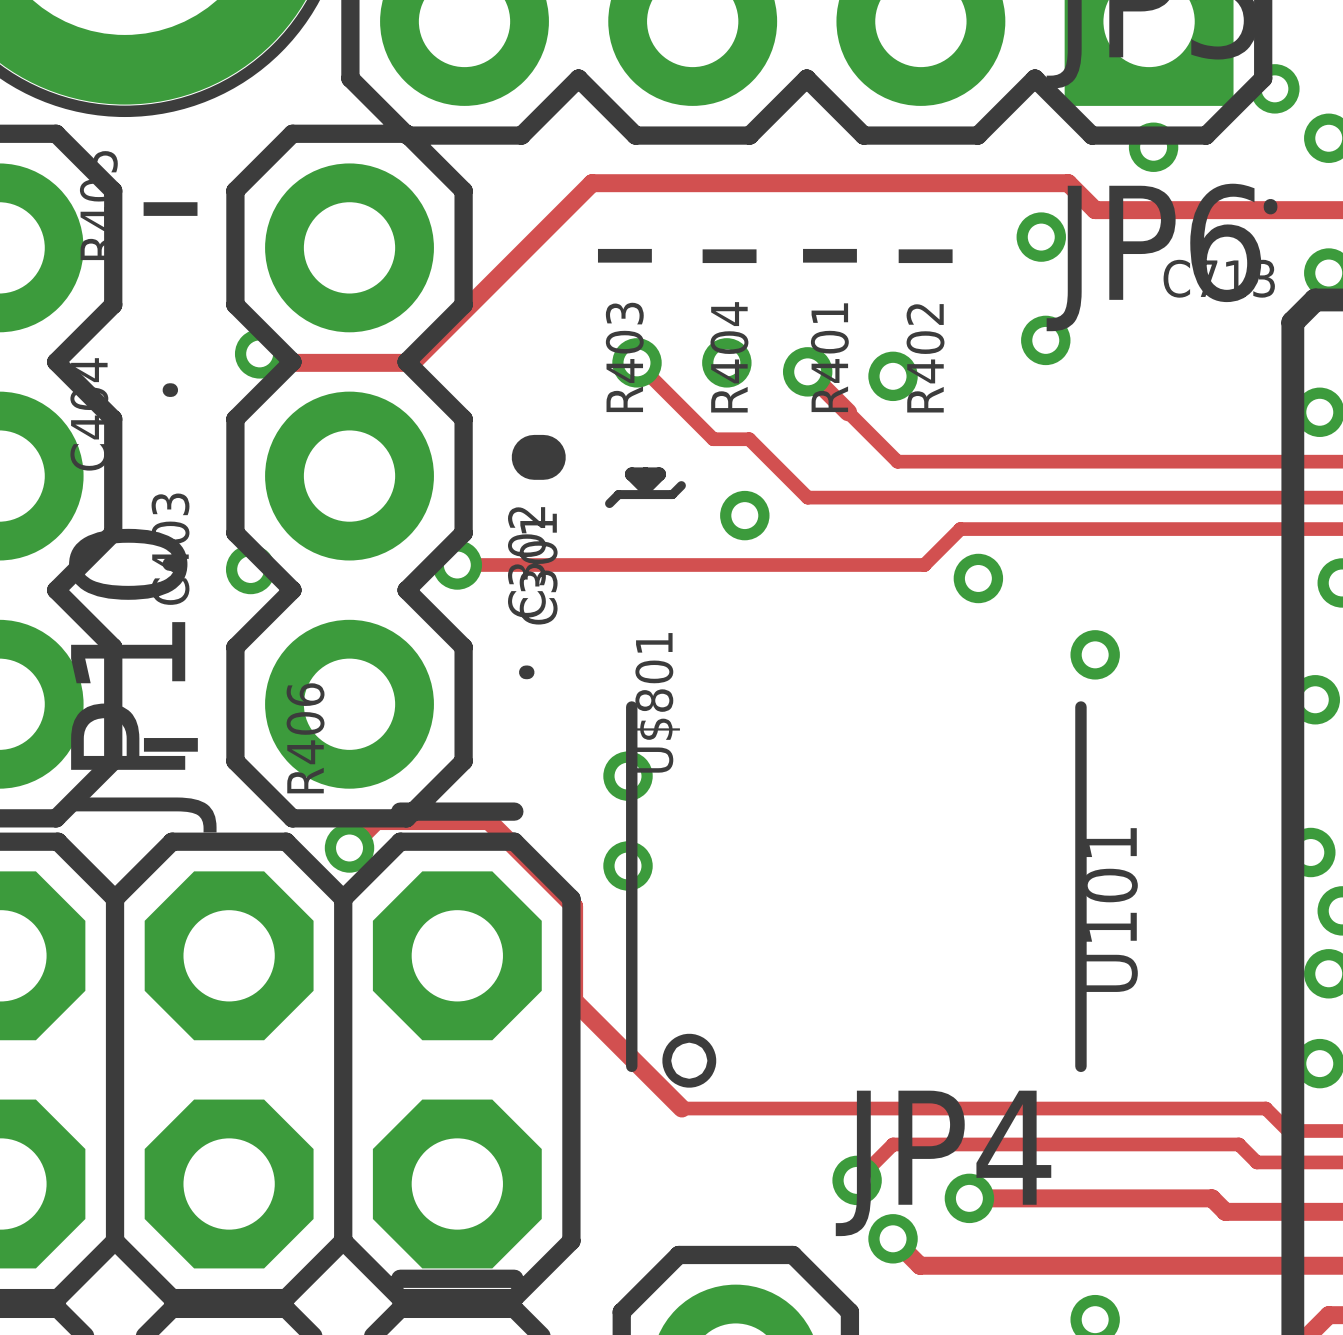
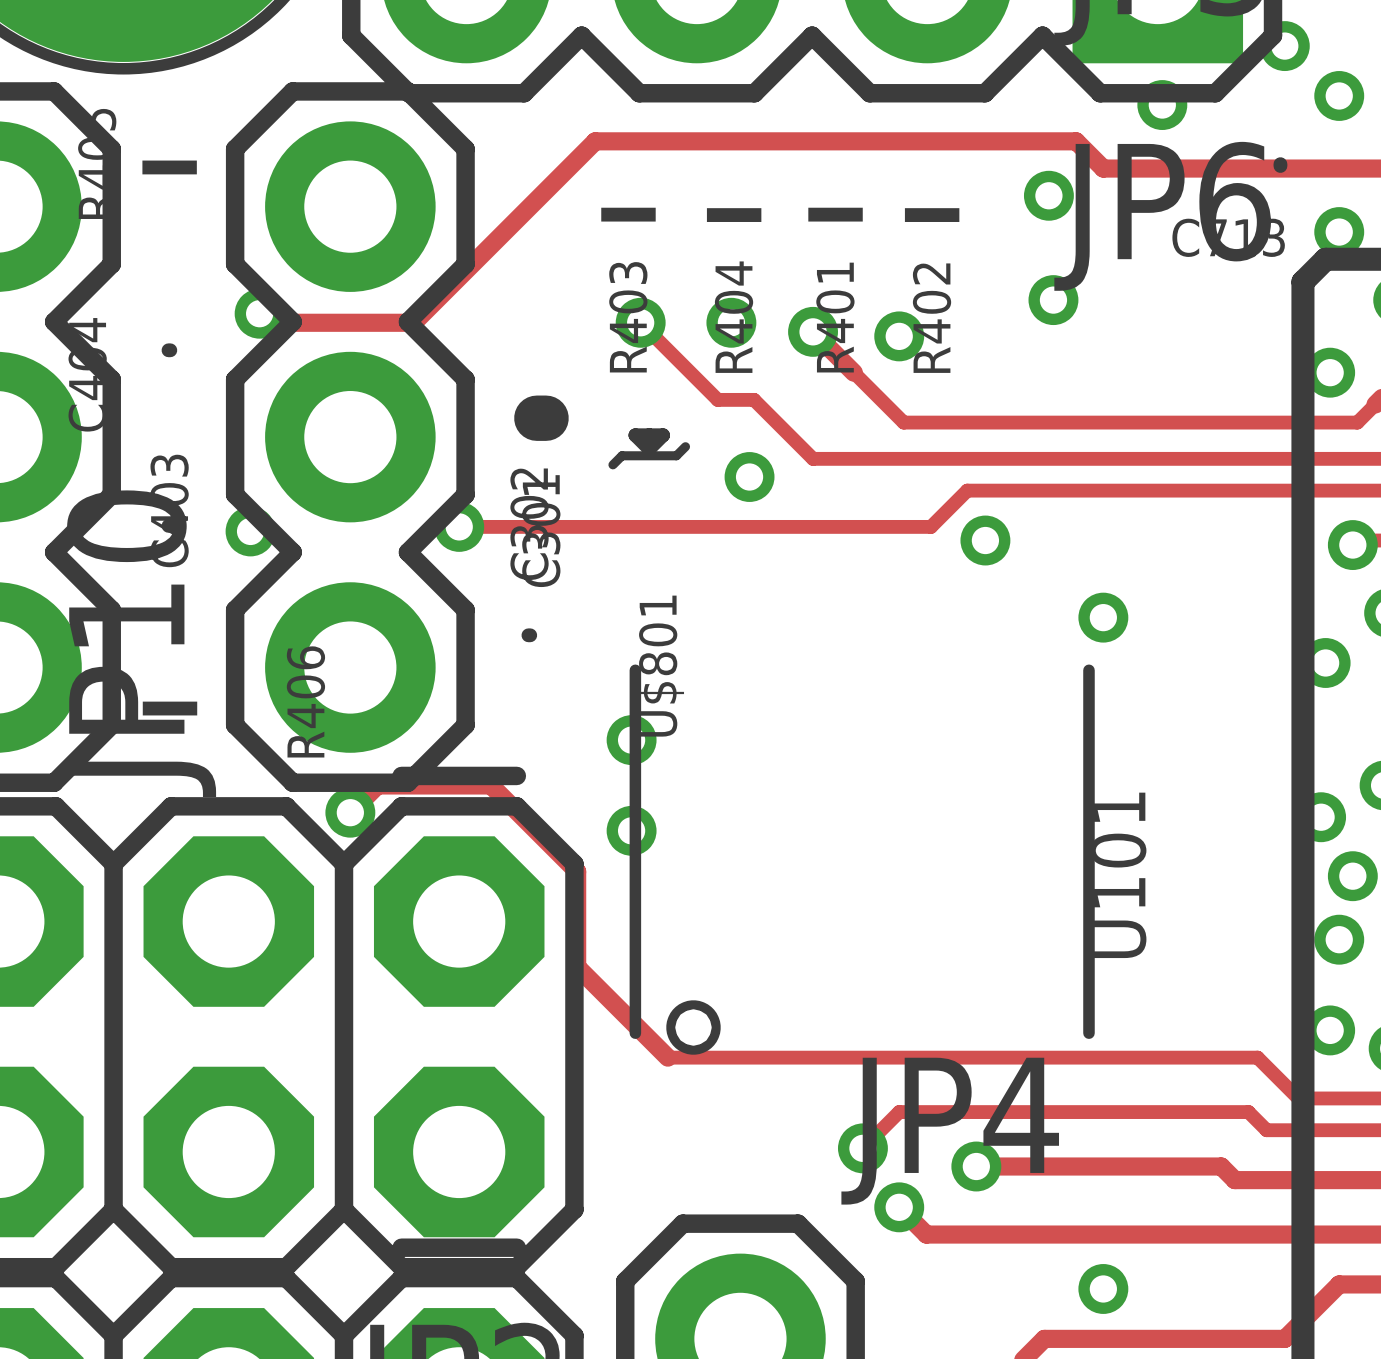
track: (663, 1090) (681, 1108) (1265, 1108) -> (667, 1057) (1257, 1057) (1275, 1075)

